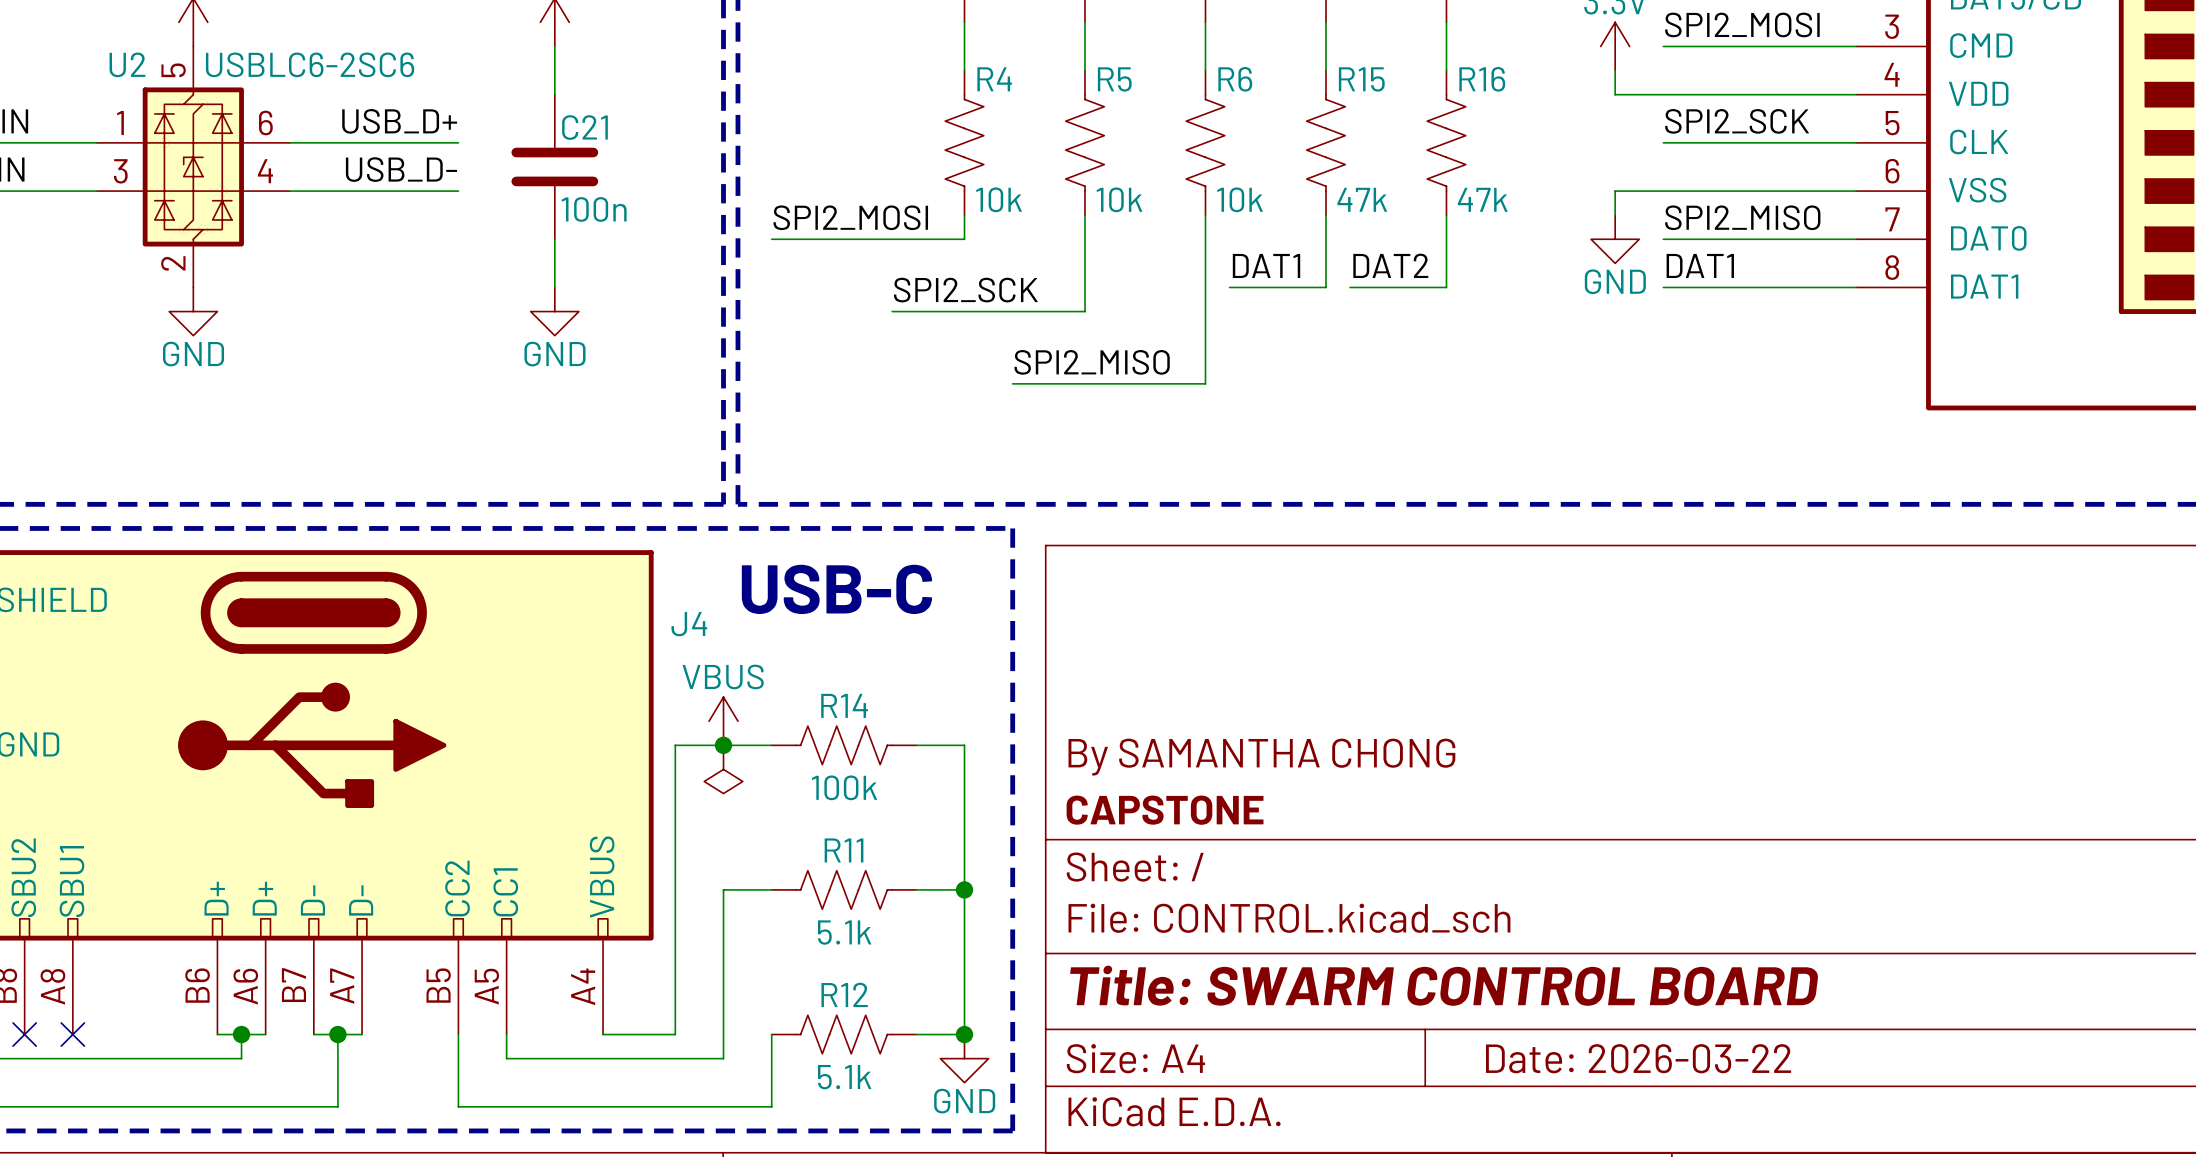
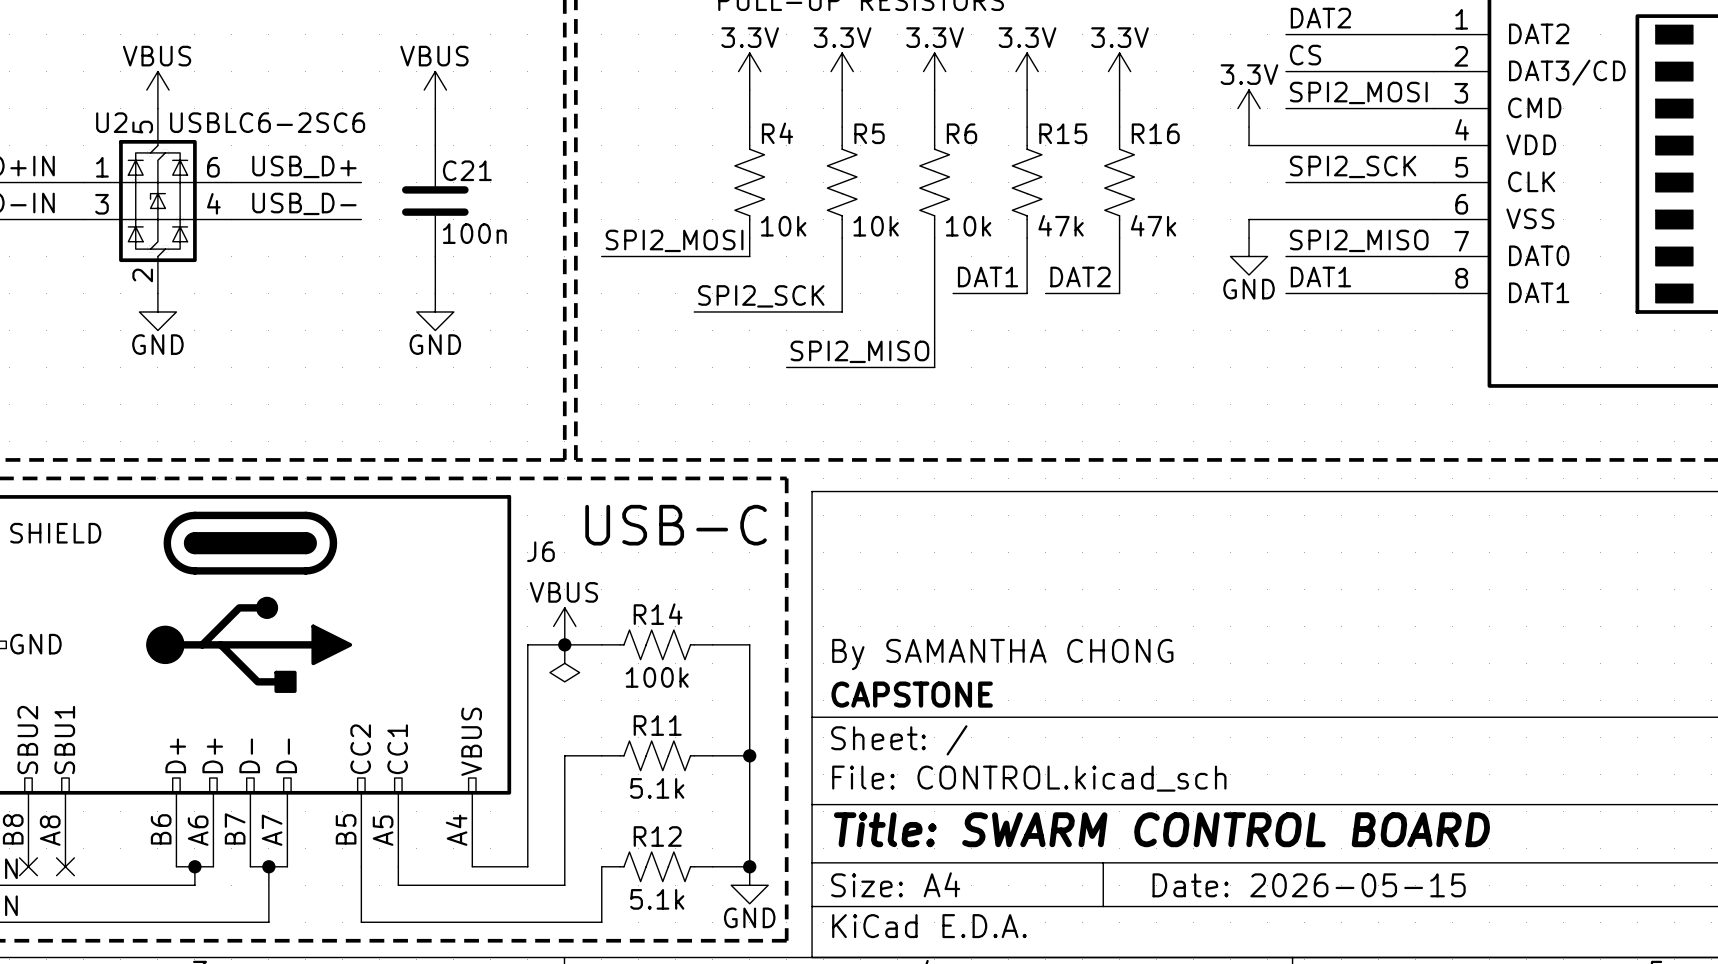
J4 name: J4 (689, 624) -> J6 (540, 551)
title block: Date: 2026-03-22 (1638, 1058) -> Date: 2026-05-15 (1309, 885)

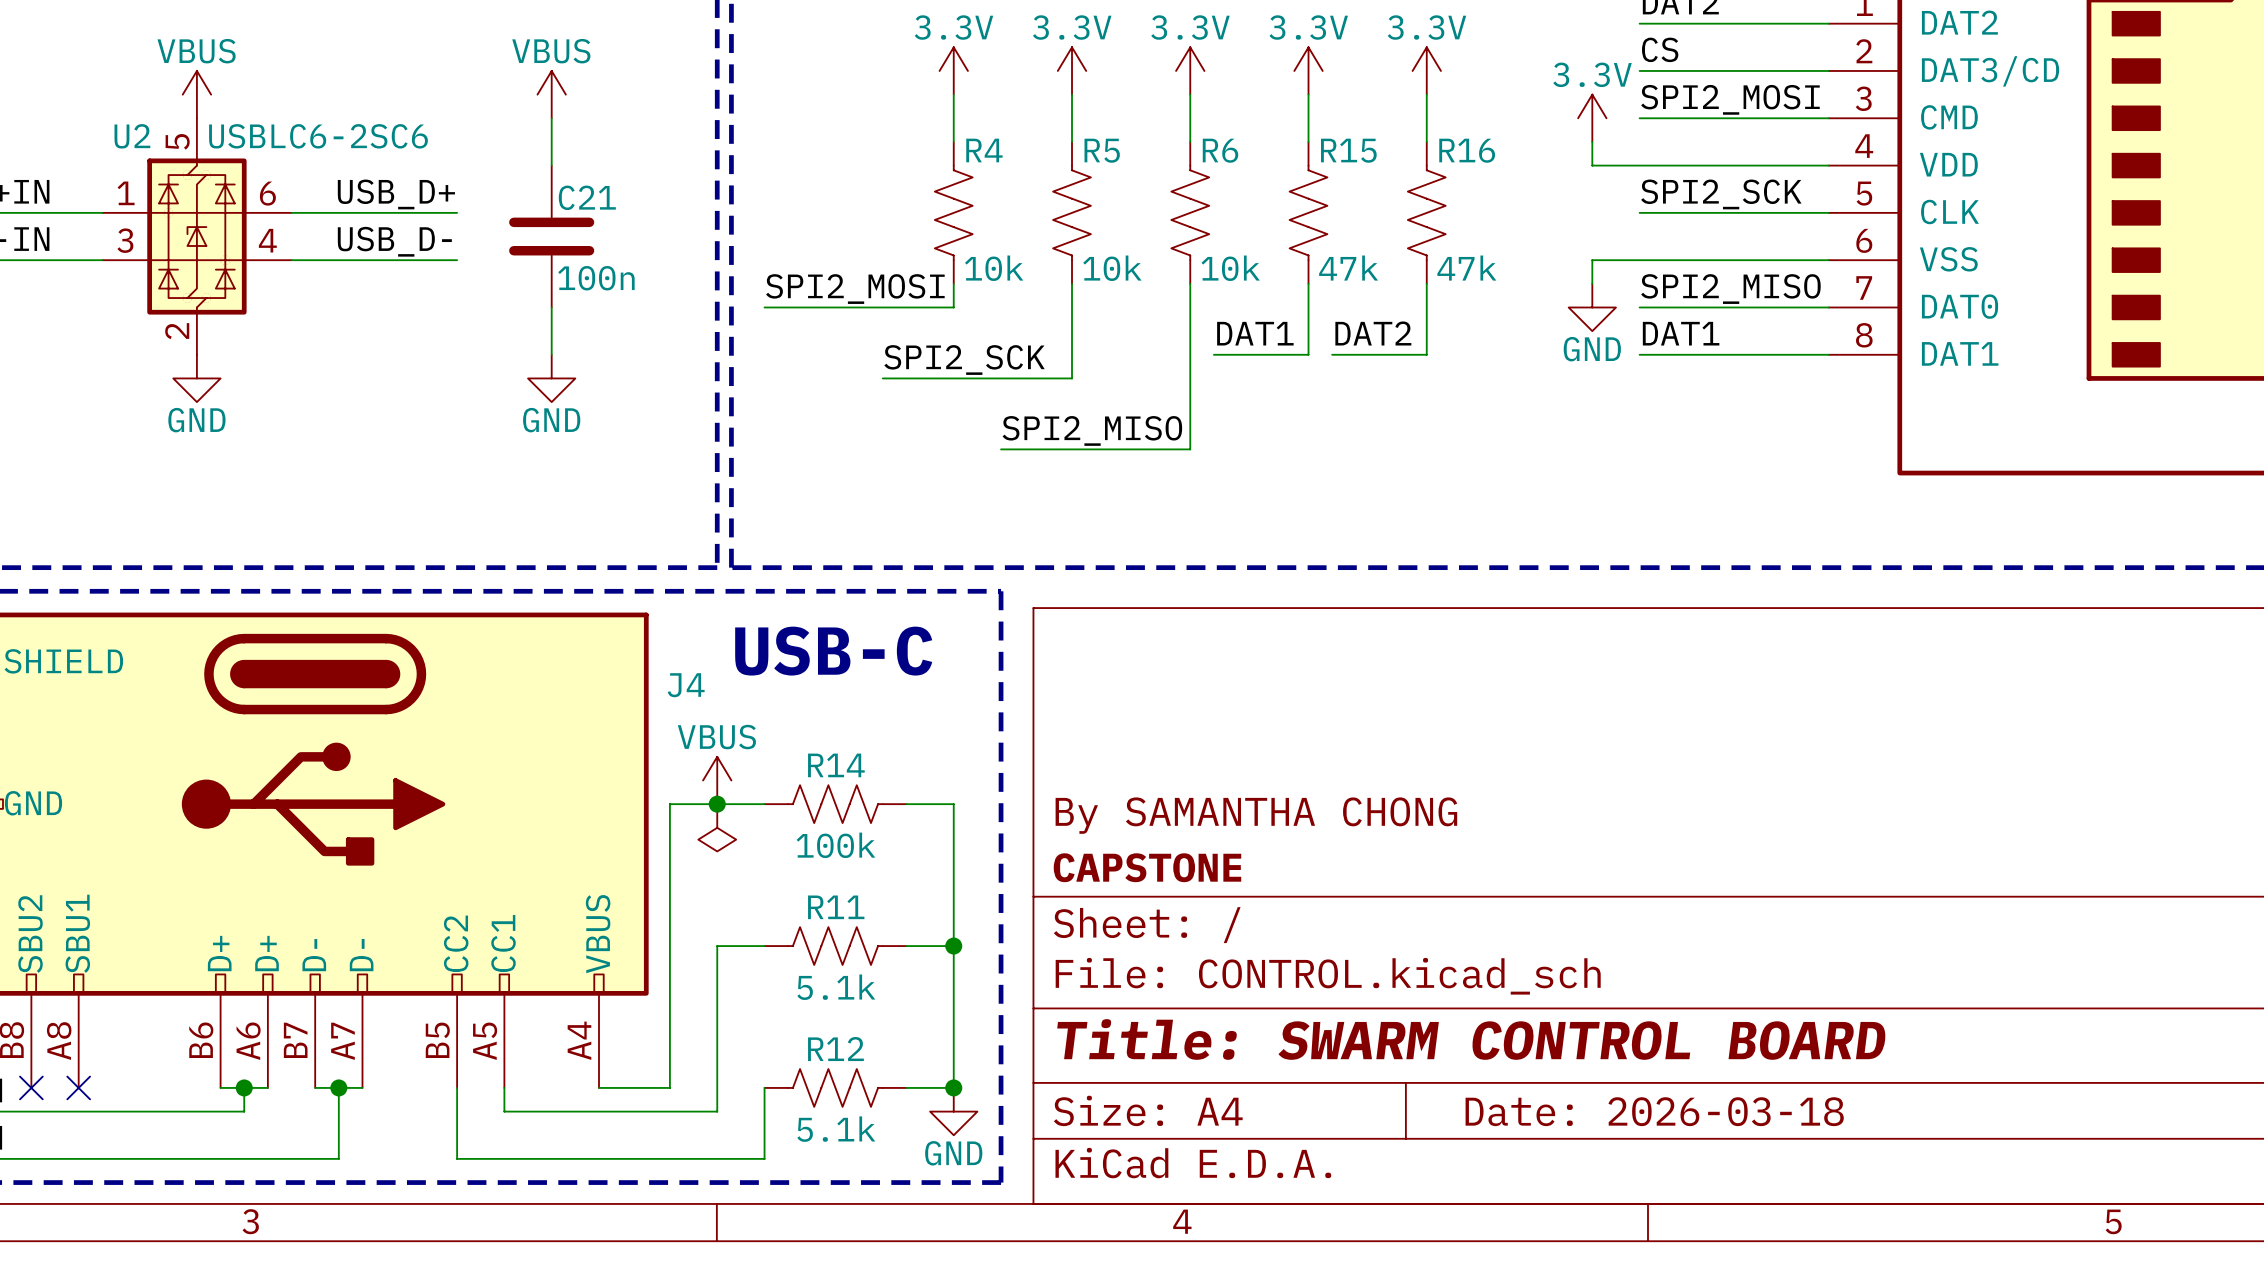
J6 name: J6 (540, 551) -> J4 (686, 685)
title block: Date: 2026-05-15 (1309, 885) -> Date: 2026-03-18 (1654, 1111)

